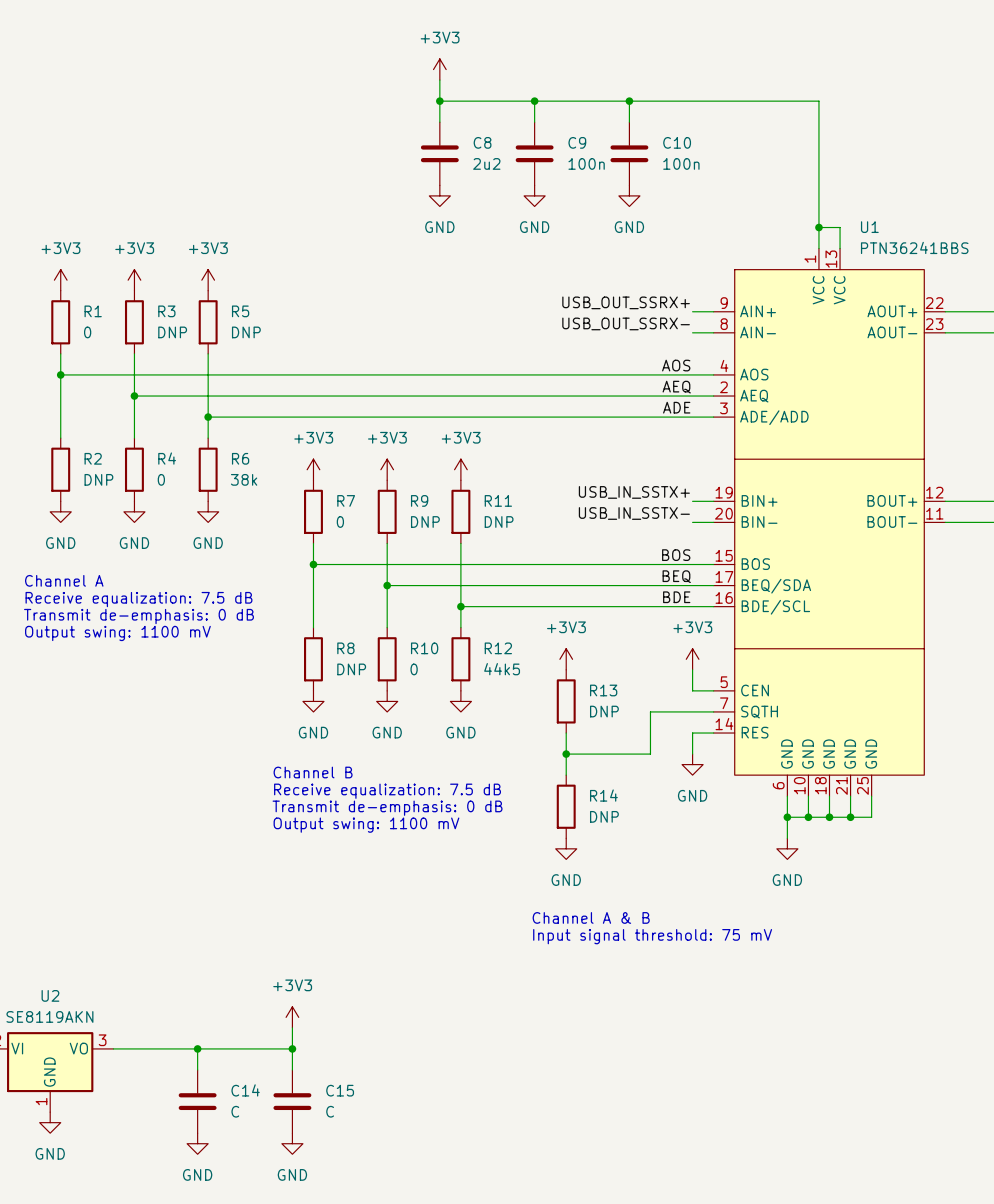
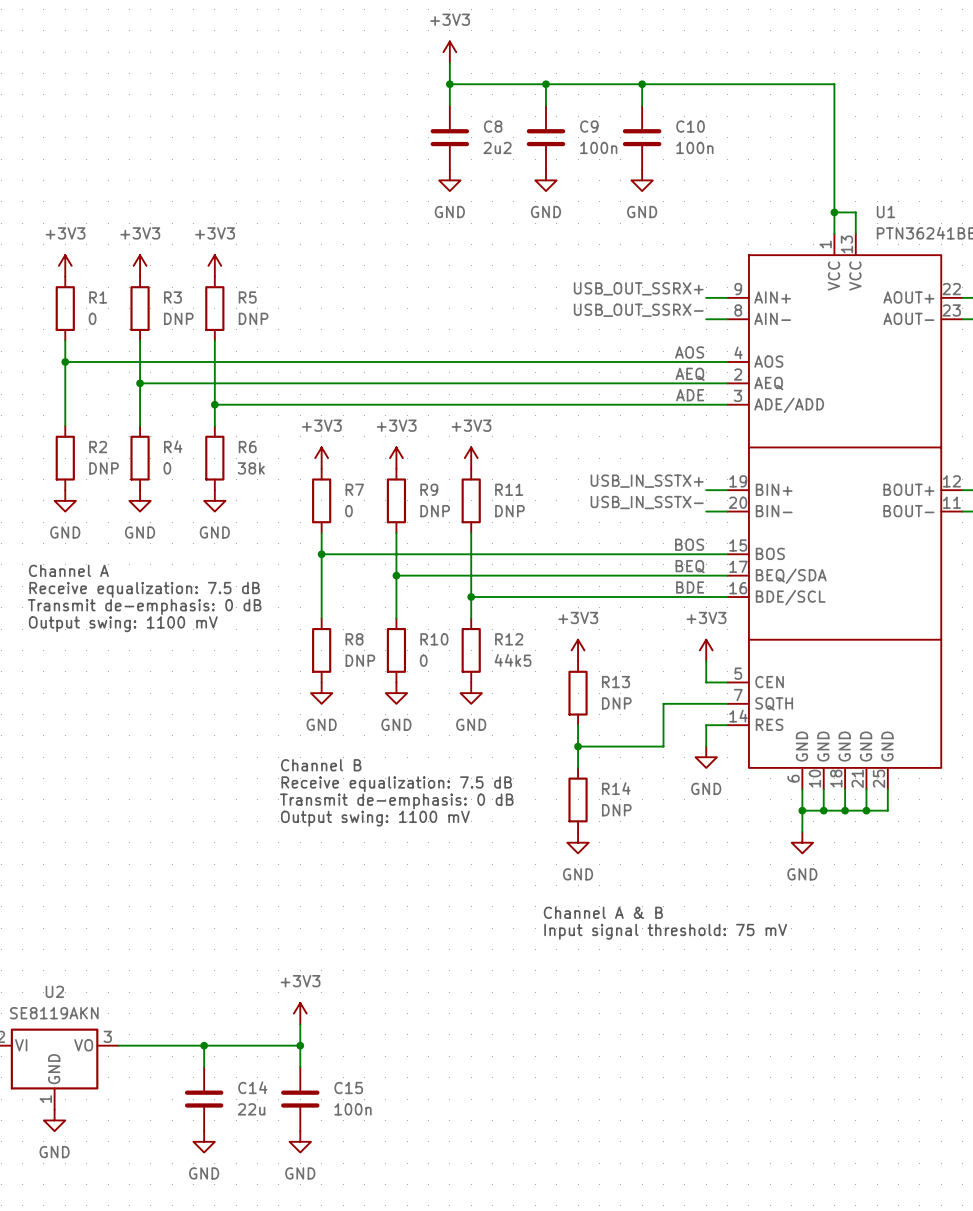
C14 value: C (235, 1111) -> 22u (251, 1109)
C15 value: C (330, 1111) -> 100n (353, 1109)

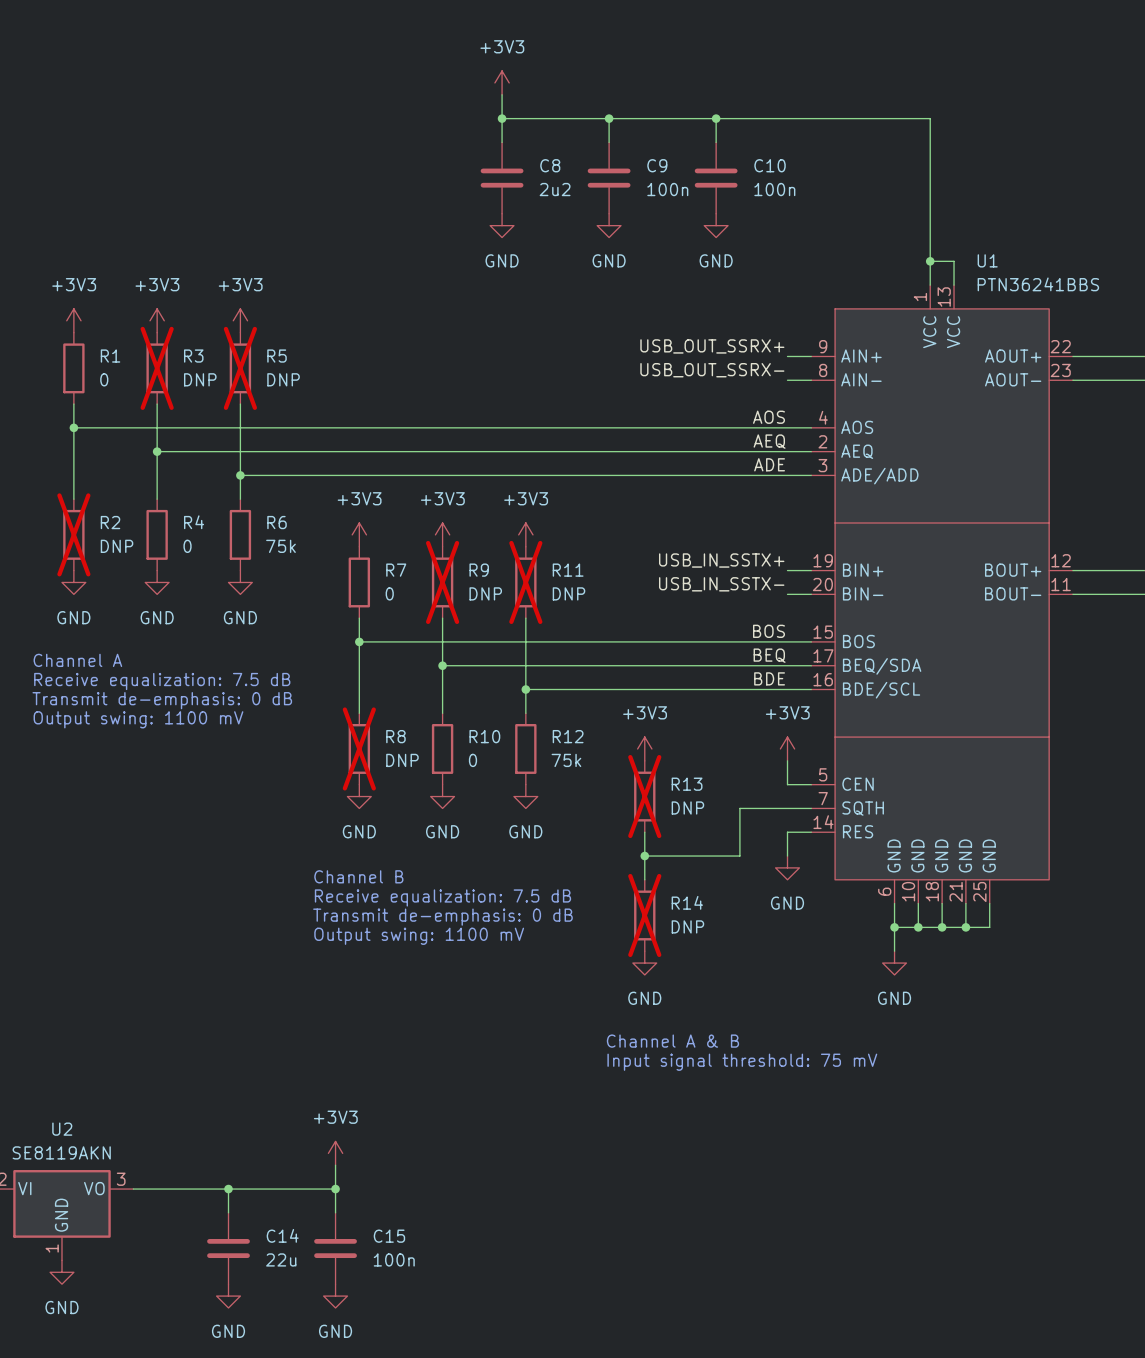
R3 do-not-place cross: none -> (157, 368)
R5 do-not-place cross: none -> (240, 368)
R2 do-not-place cross: none -> (73, 534)
R6 value: 38k (251, 468) -> 75k (280, 546)
R9 do-not-place cross: none -> (442, 582)
R11 do-not-place cross: none -> (525, 582)
R8 do-not-place cross: none -> (359, 748)
R12 value: 44k5 (513, 660) -> 75k (566, 760)
R13 do-not-place cross: none -> (644, 796)
R14 do-not-place cross: none -> (644, 915)

